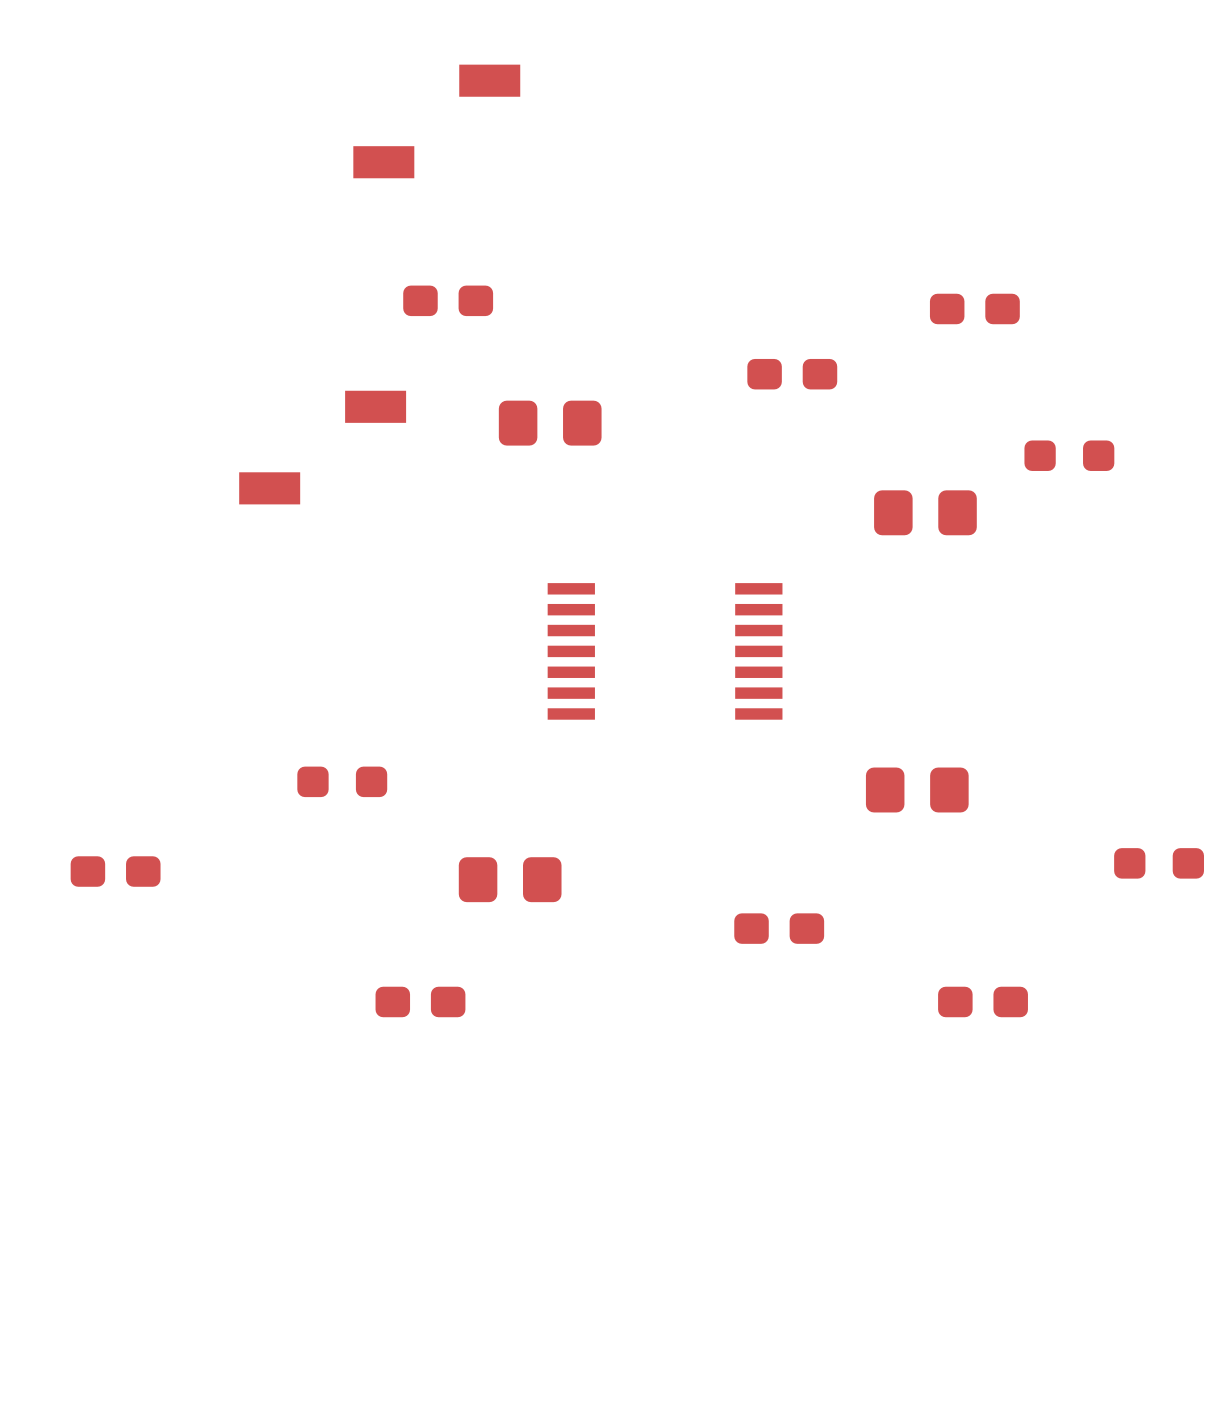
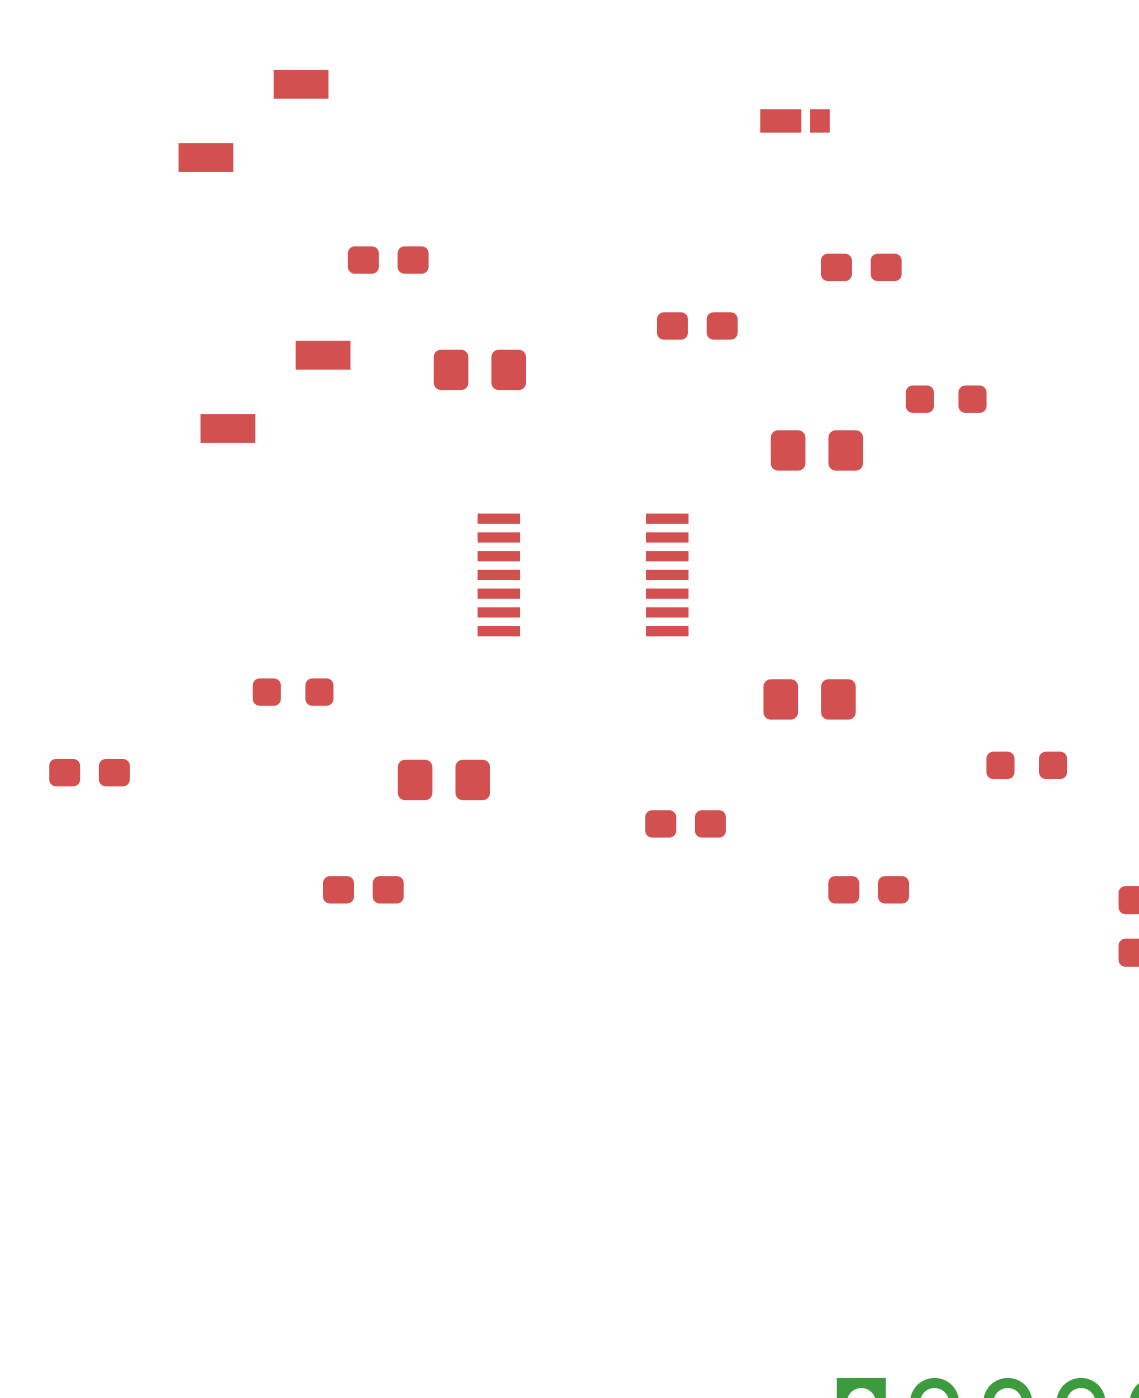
part position: (436, 121) -> (253, 120)
part: none -> (795, 120)

